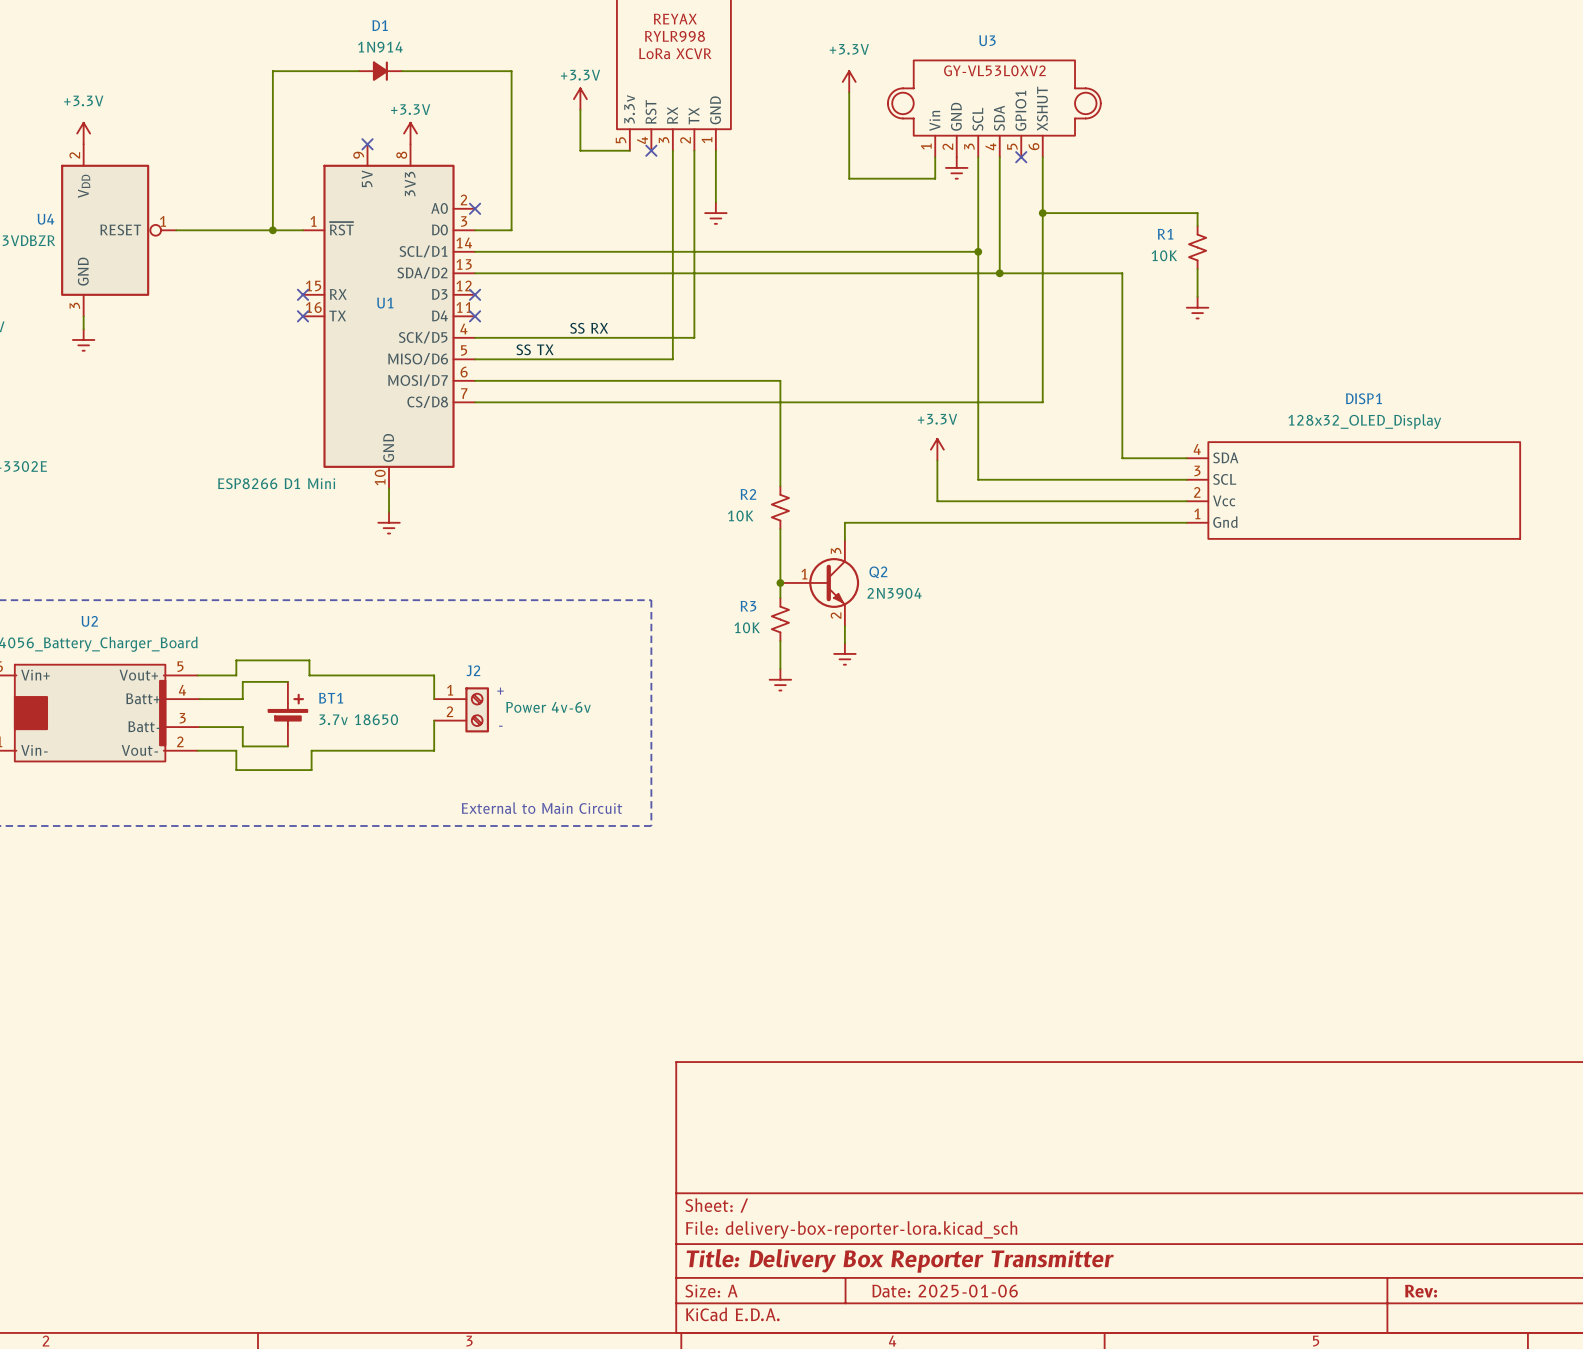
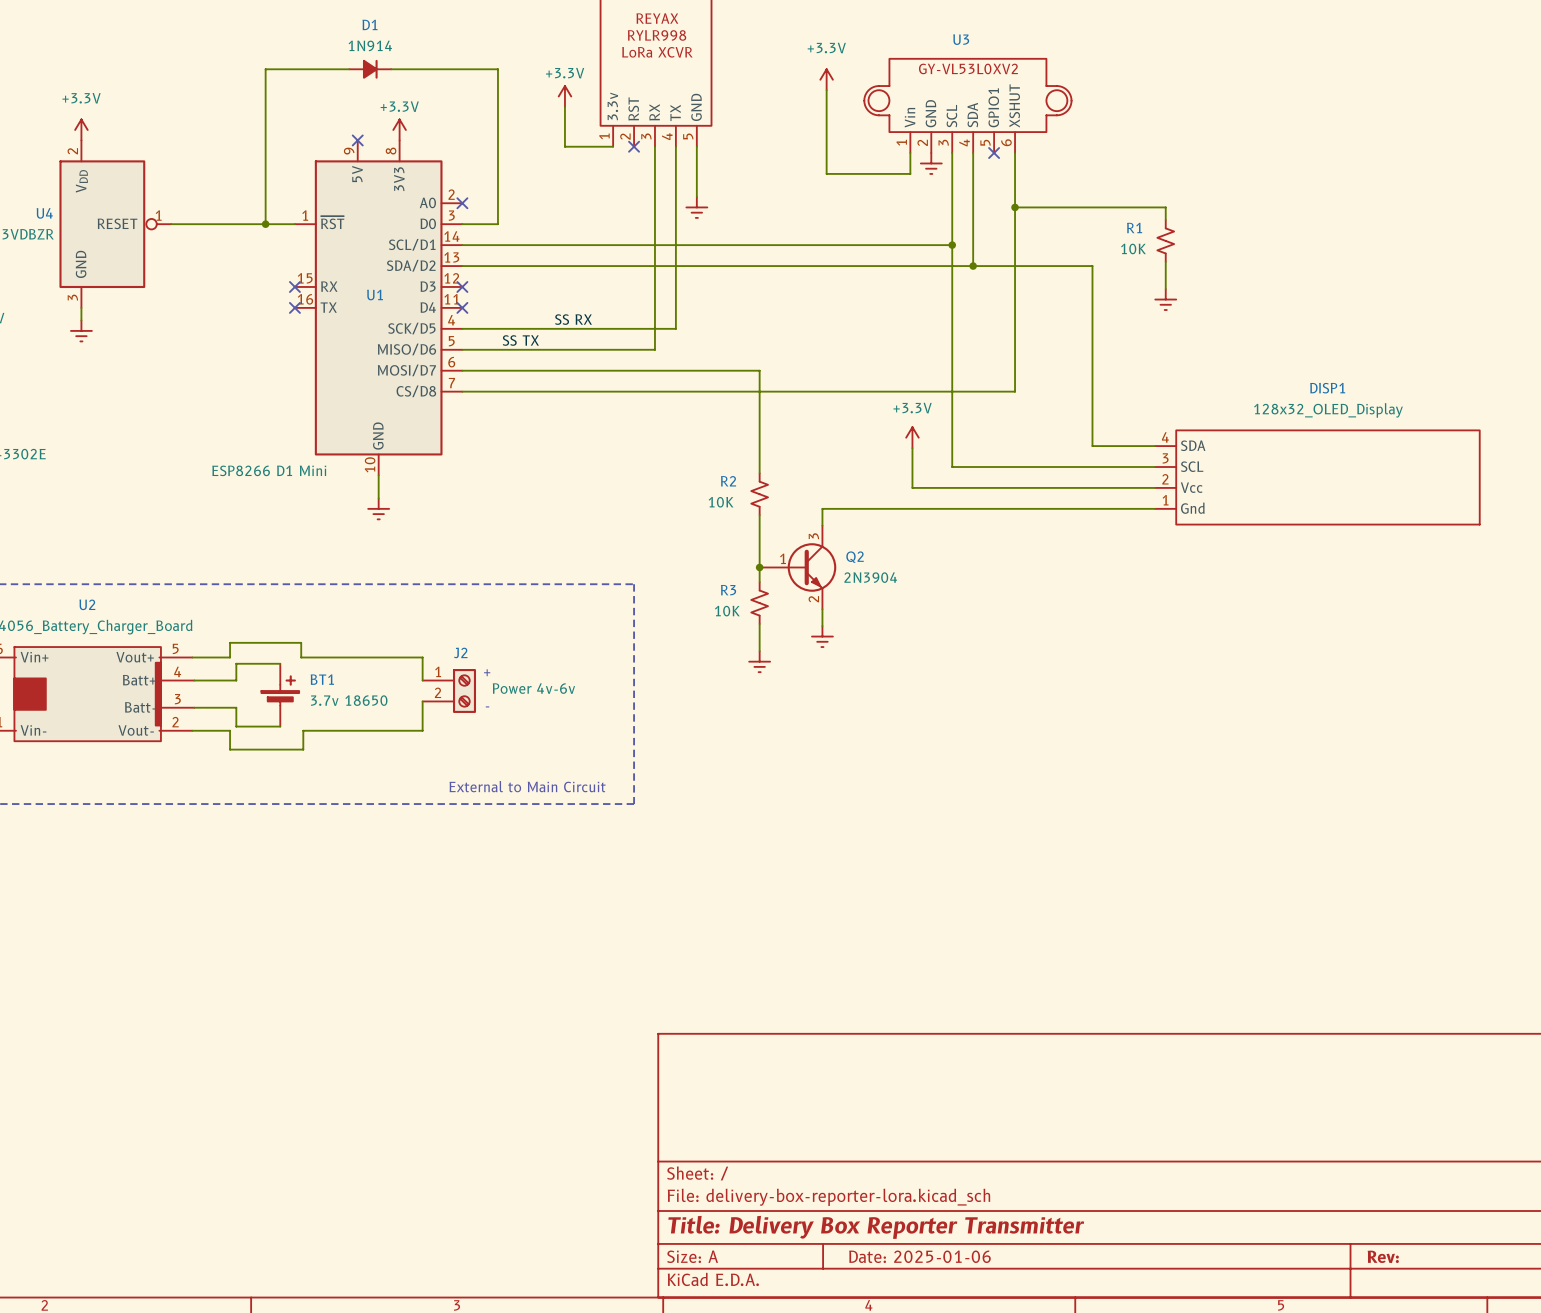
part pin number: 5 (621, 140) -> 1 (604, 136)
part pin number: 4 (642, 140) -> 2 (625, 136)
part pin number: 2 (685, 140) -> 4 (667, 136)
part pin number: 1 (707, 140) -> 5 (688, 136)

